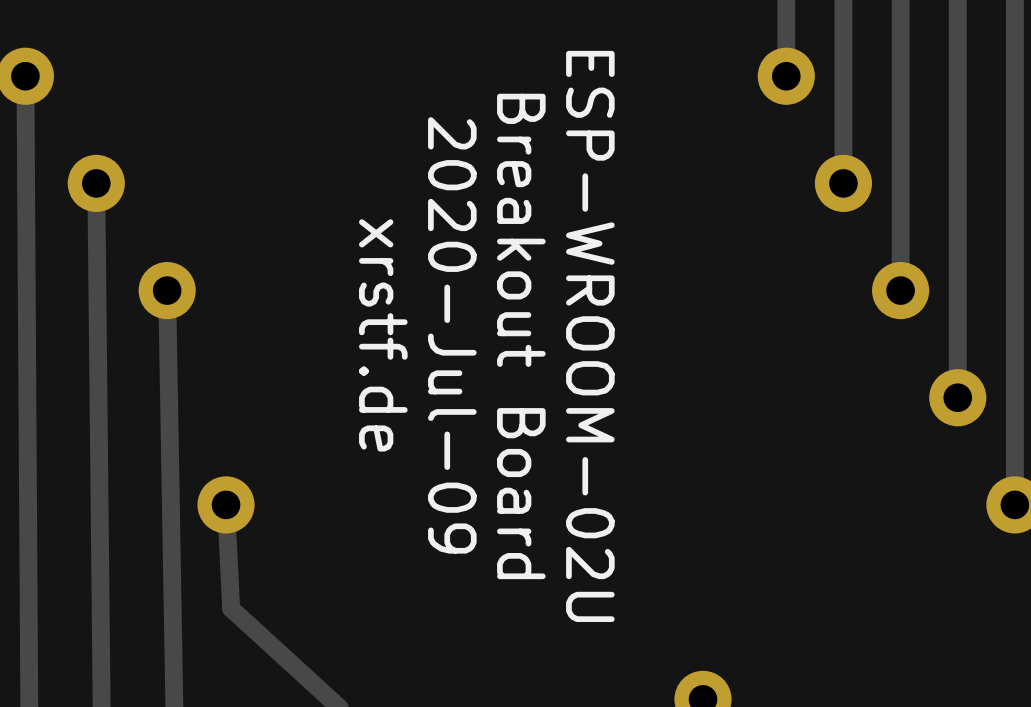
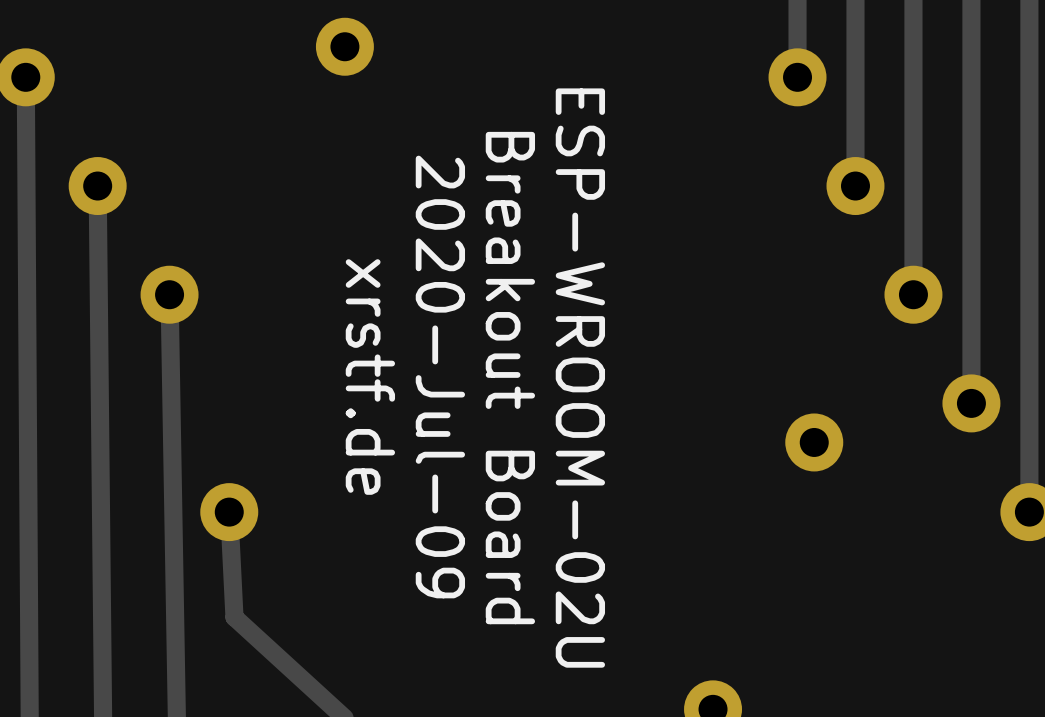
via: none -> (344, 46)
text position: xrstf.de (383, 335) -> xrstf.de (370, 377)
text position: 2020-Jul-09 (452, 335) -> 2020-Jul-09 (440, 377)
text position: Breakout Board (521, 336) -> Breakout Board (510, 378)
text position: ESP-WROOM-02U (590, 336) -> ESP-WROOM-02U (580, 378)
via: none -> (814, 442)

